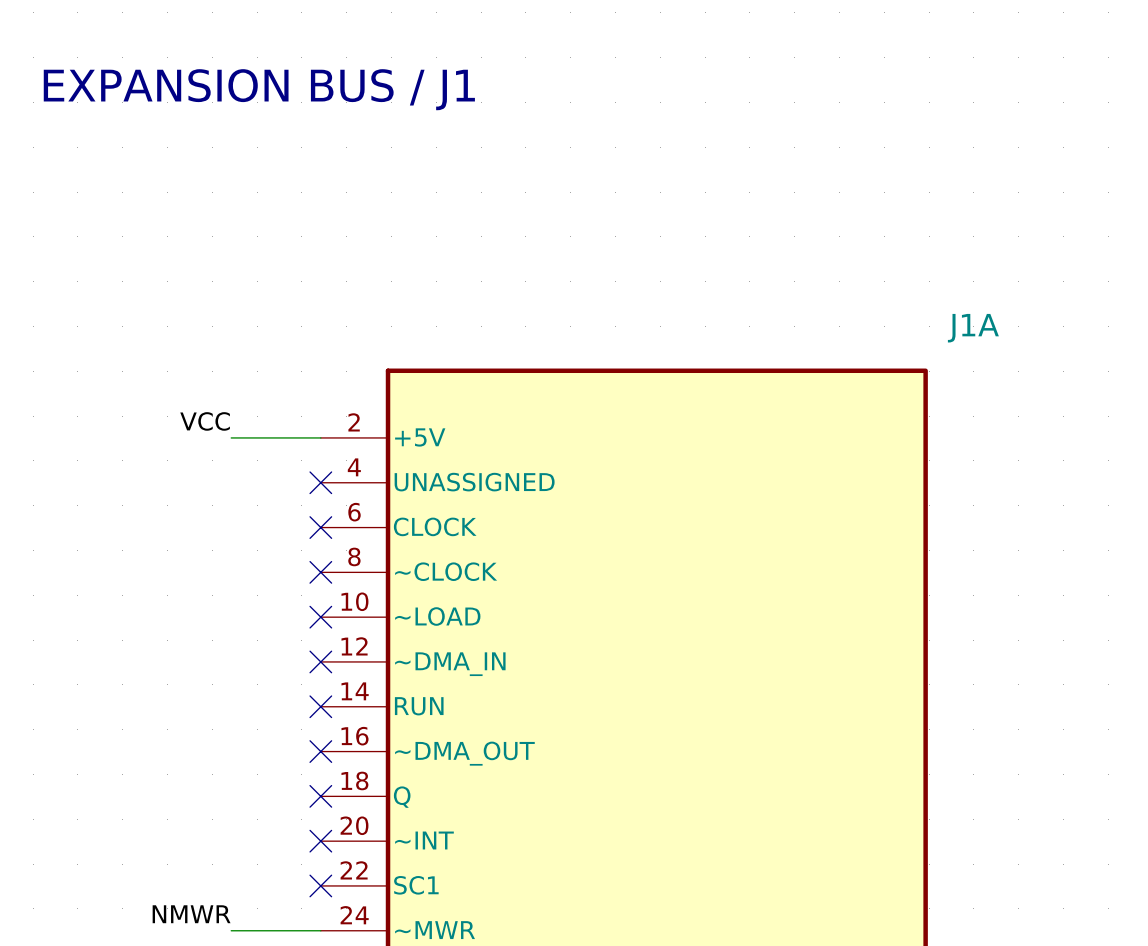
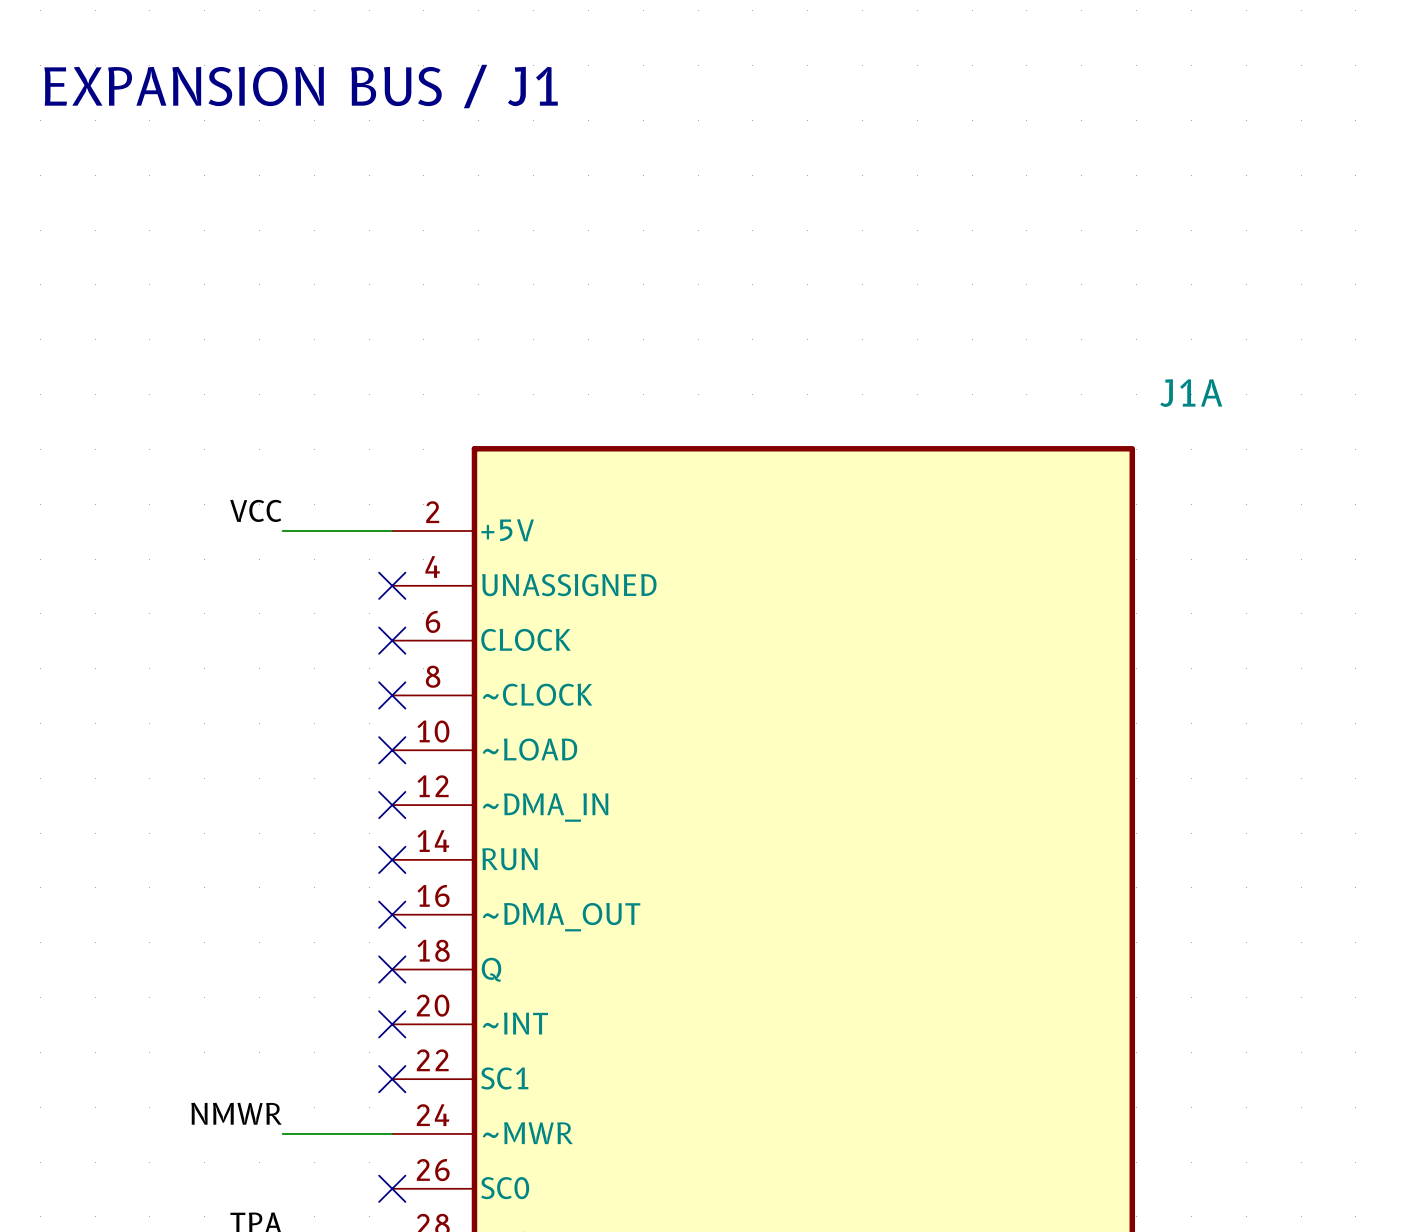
text position: EXPANSION BUS / J1 (259, 89) -> EXPANSION BUS / J1 (301, 86)

